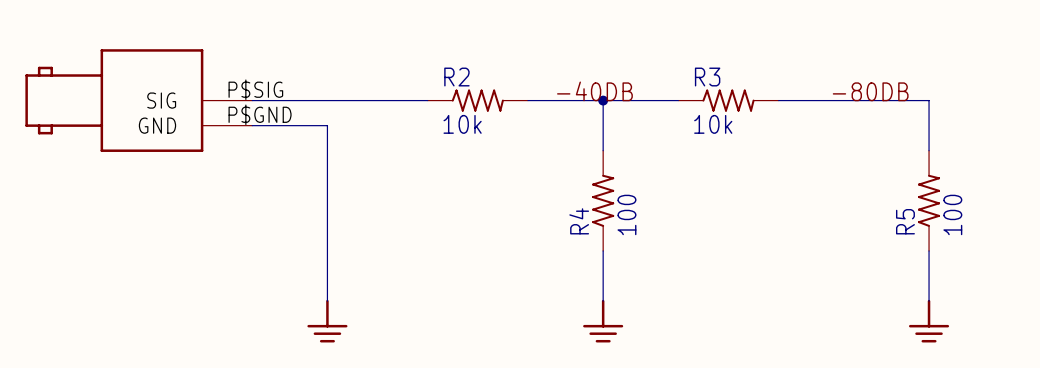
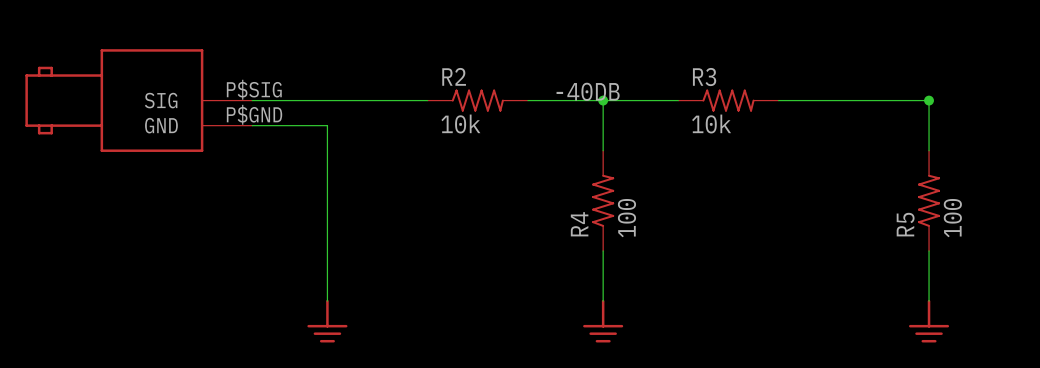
label: -80DB (870, 91) -> none
junction: none -> (929, 100)

